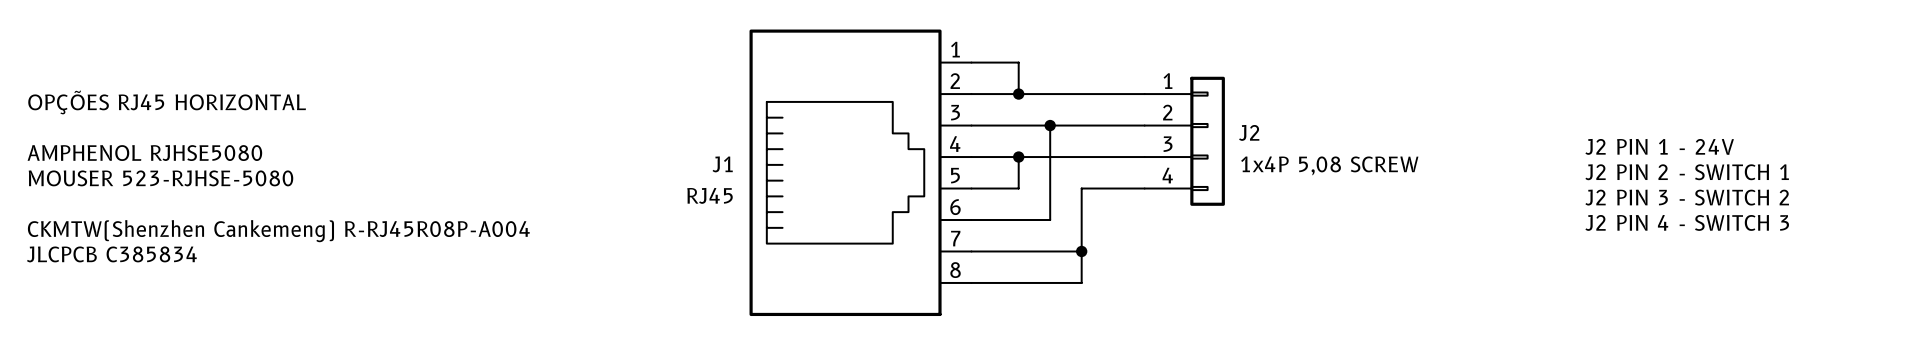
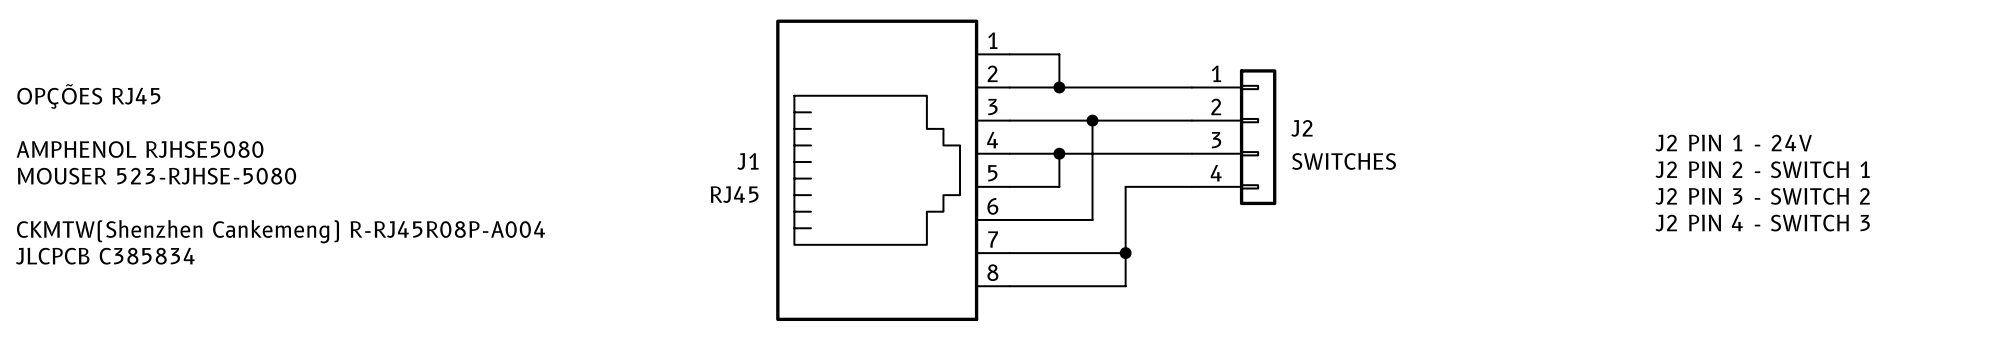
text: OPÇÕES RJ45 HORIZONTAL (167, 102) -> OPÇÕES RJ45 (88, 96)
J2 value: 1x4P 5,08 SCREW (1329, 165) -> SWITCHES (1344, 161)

